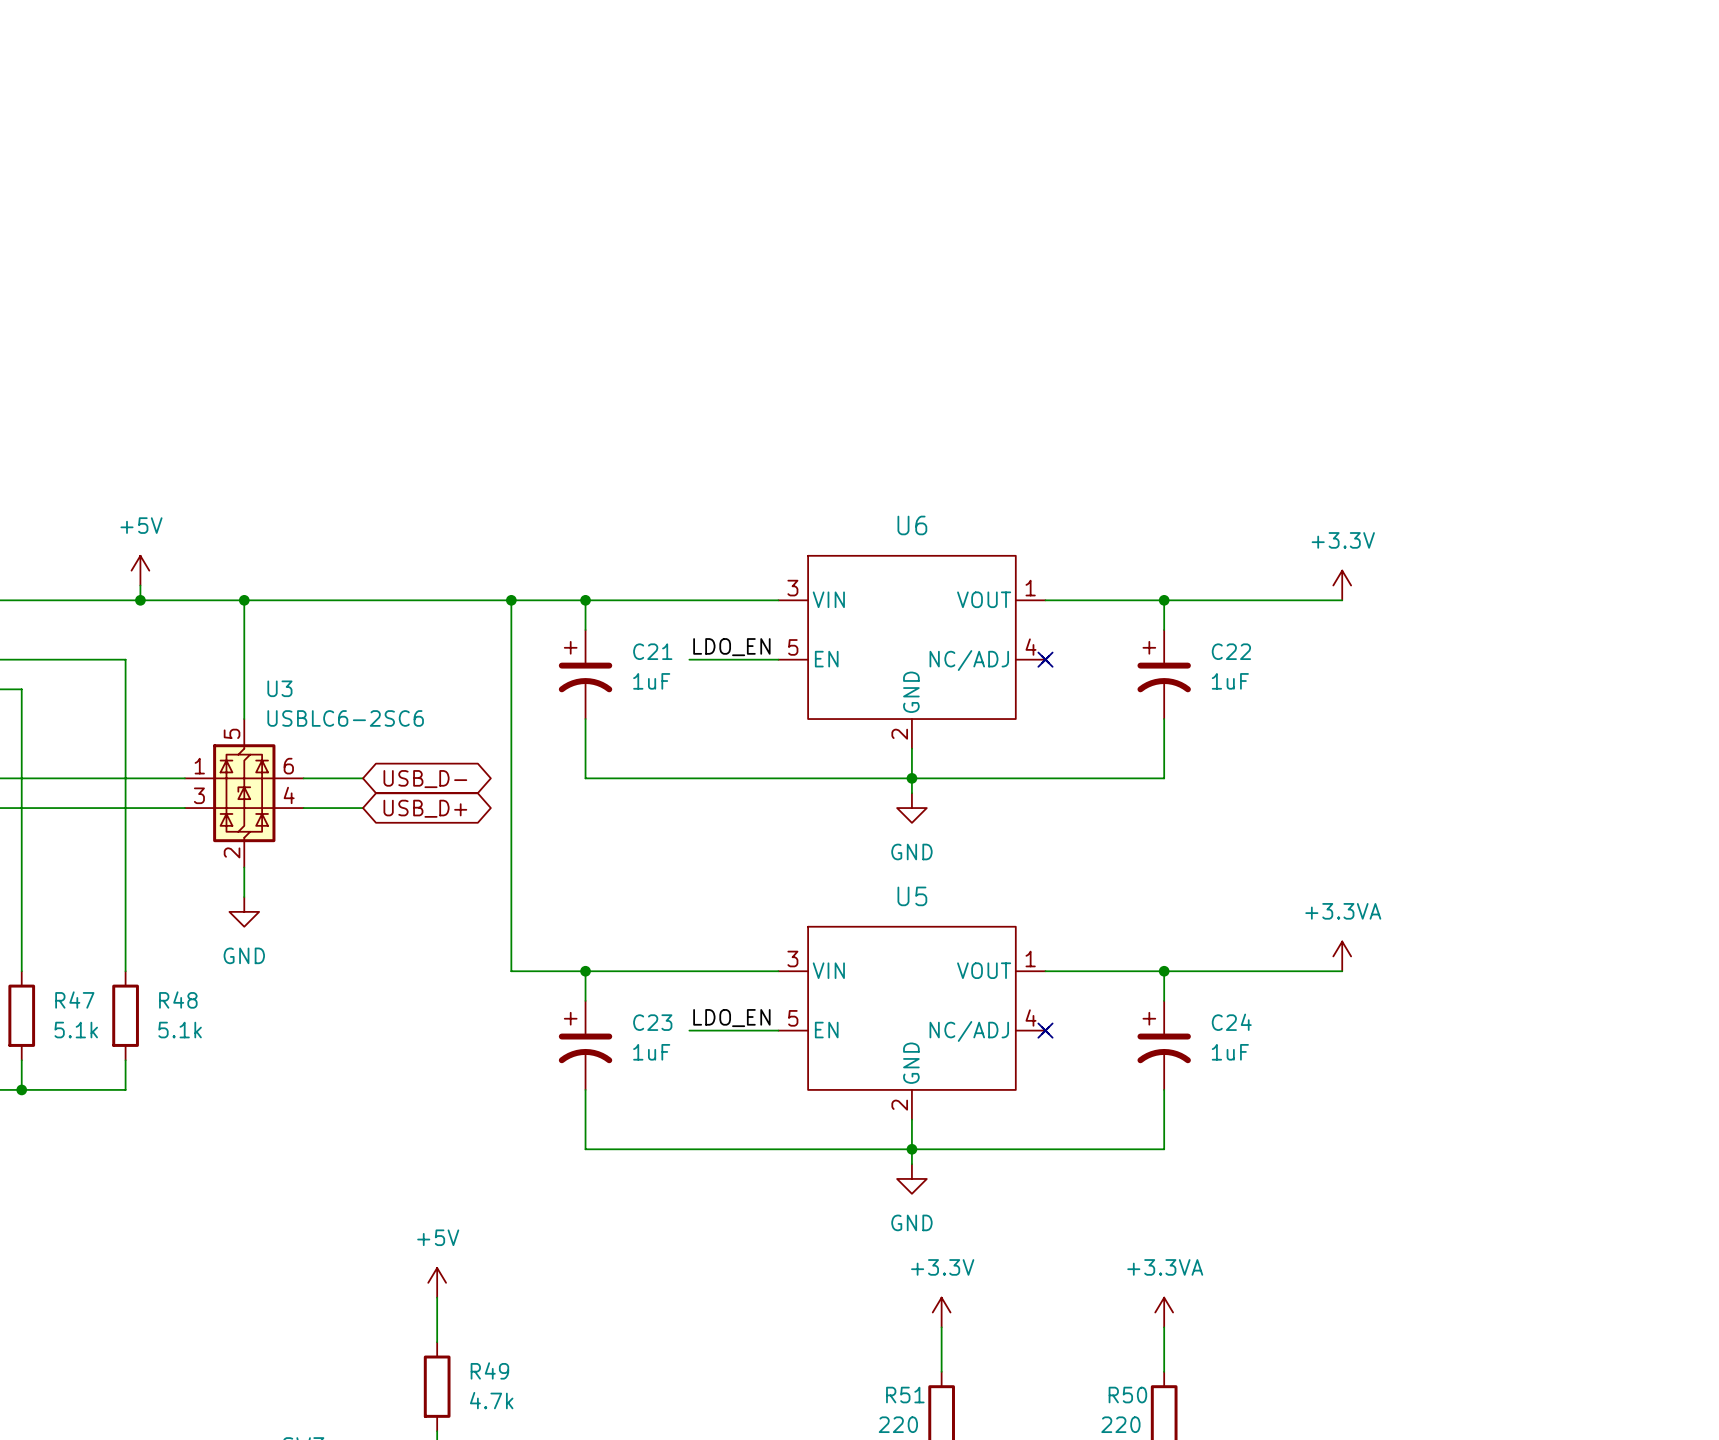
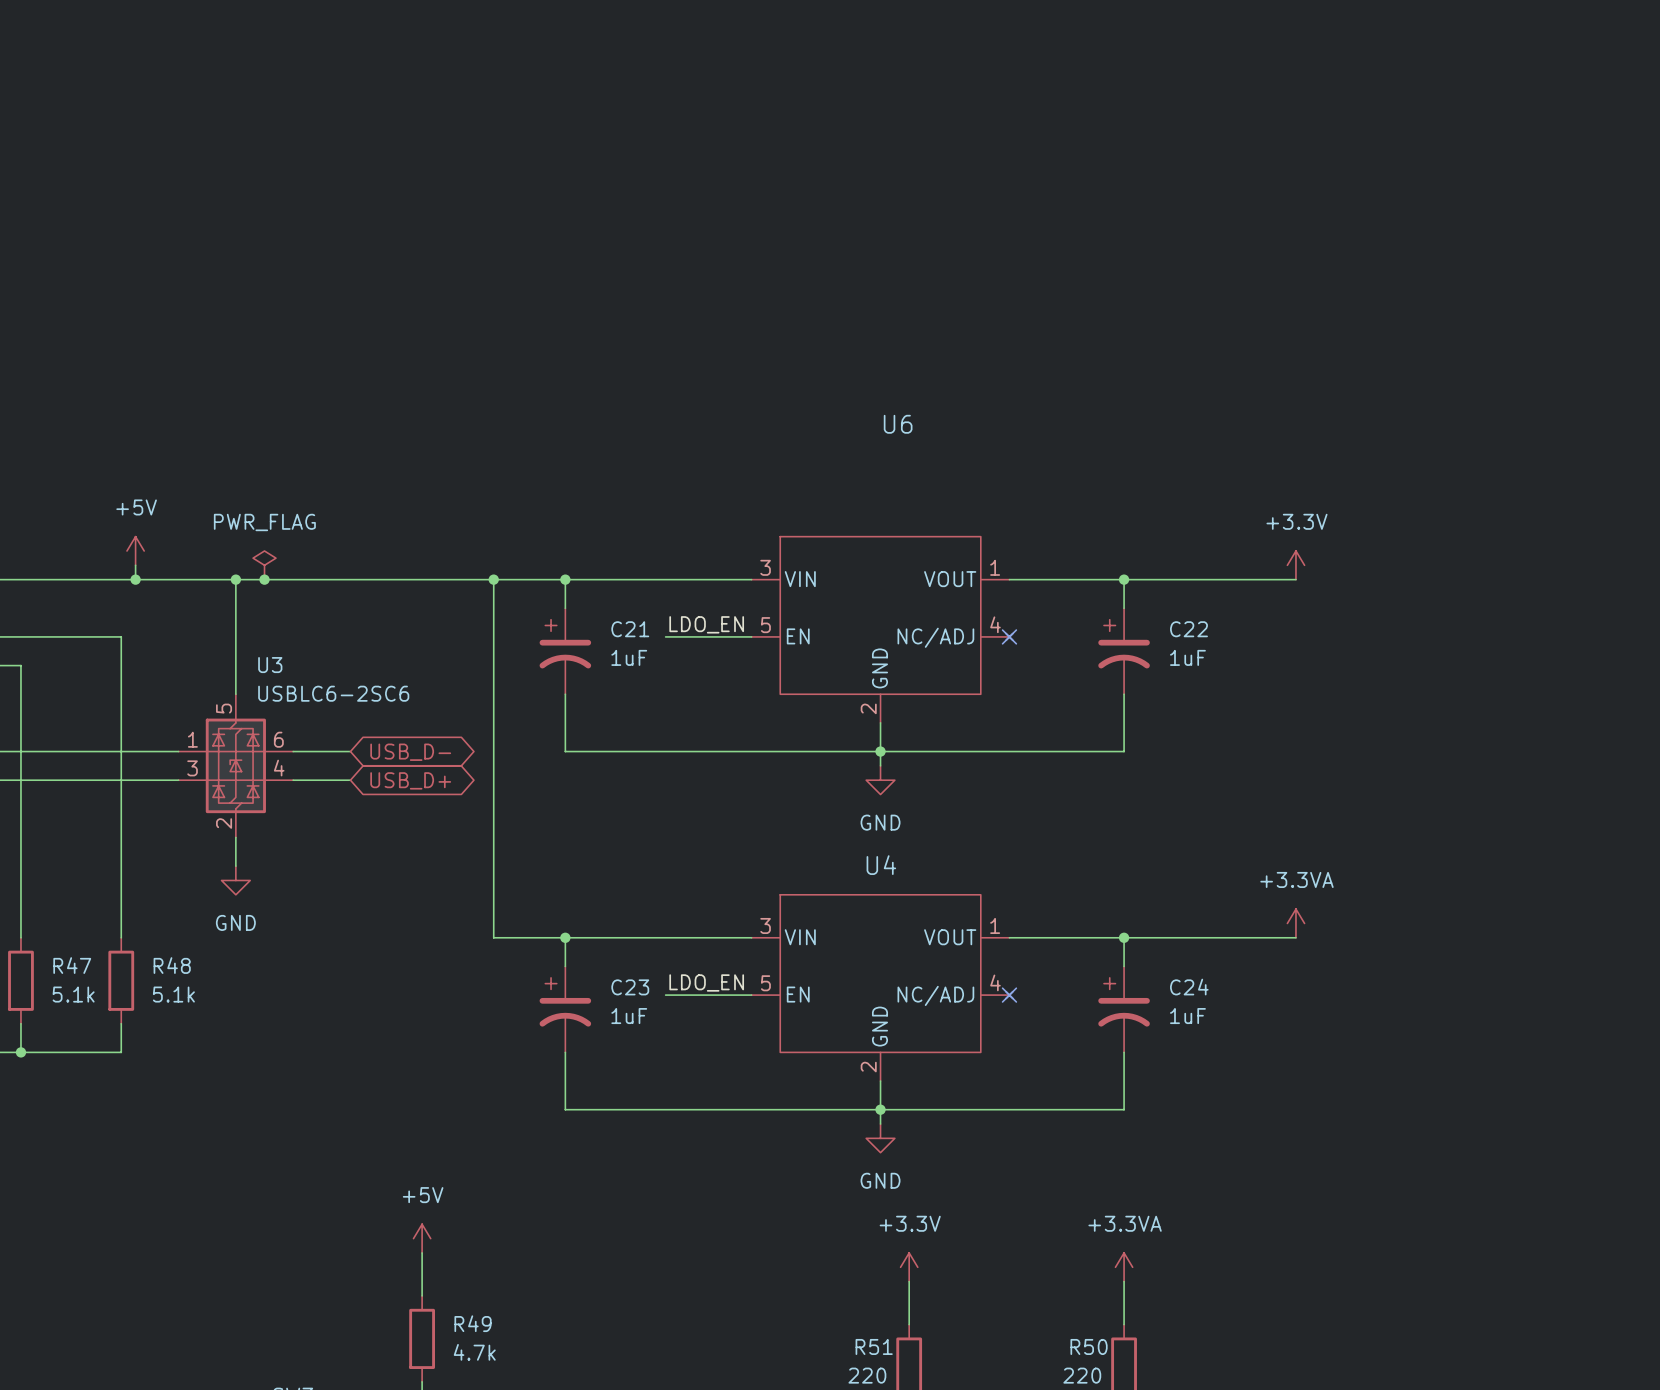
U6 name position: U6 (912, 525) -> U6 (898, 424)
power symbol: none -> PWR_FLAG (264, 565)
junction: none -> (264, 579)
U5 name: U5 (912, 896) -> U4 (881, 865)

